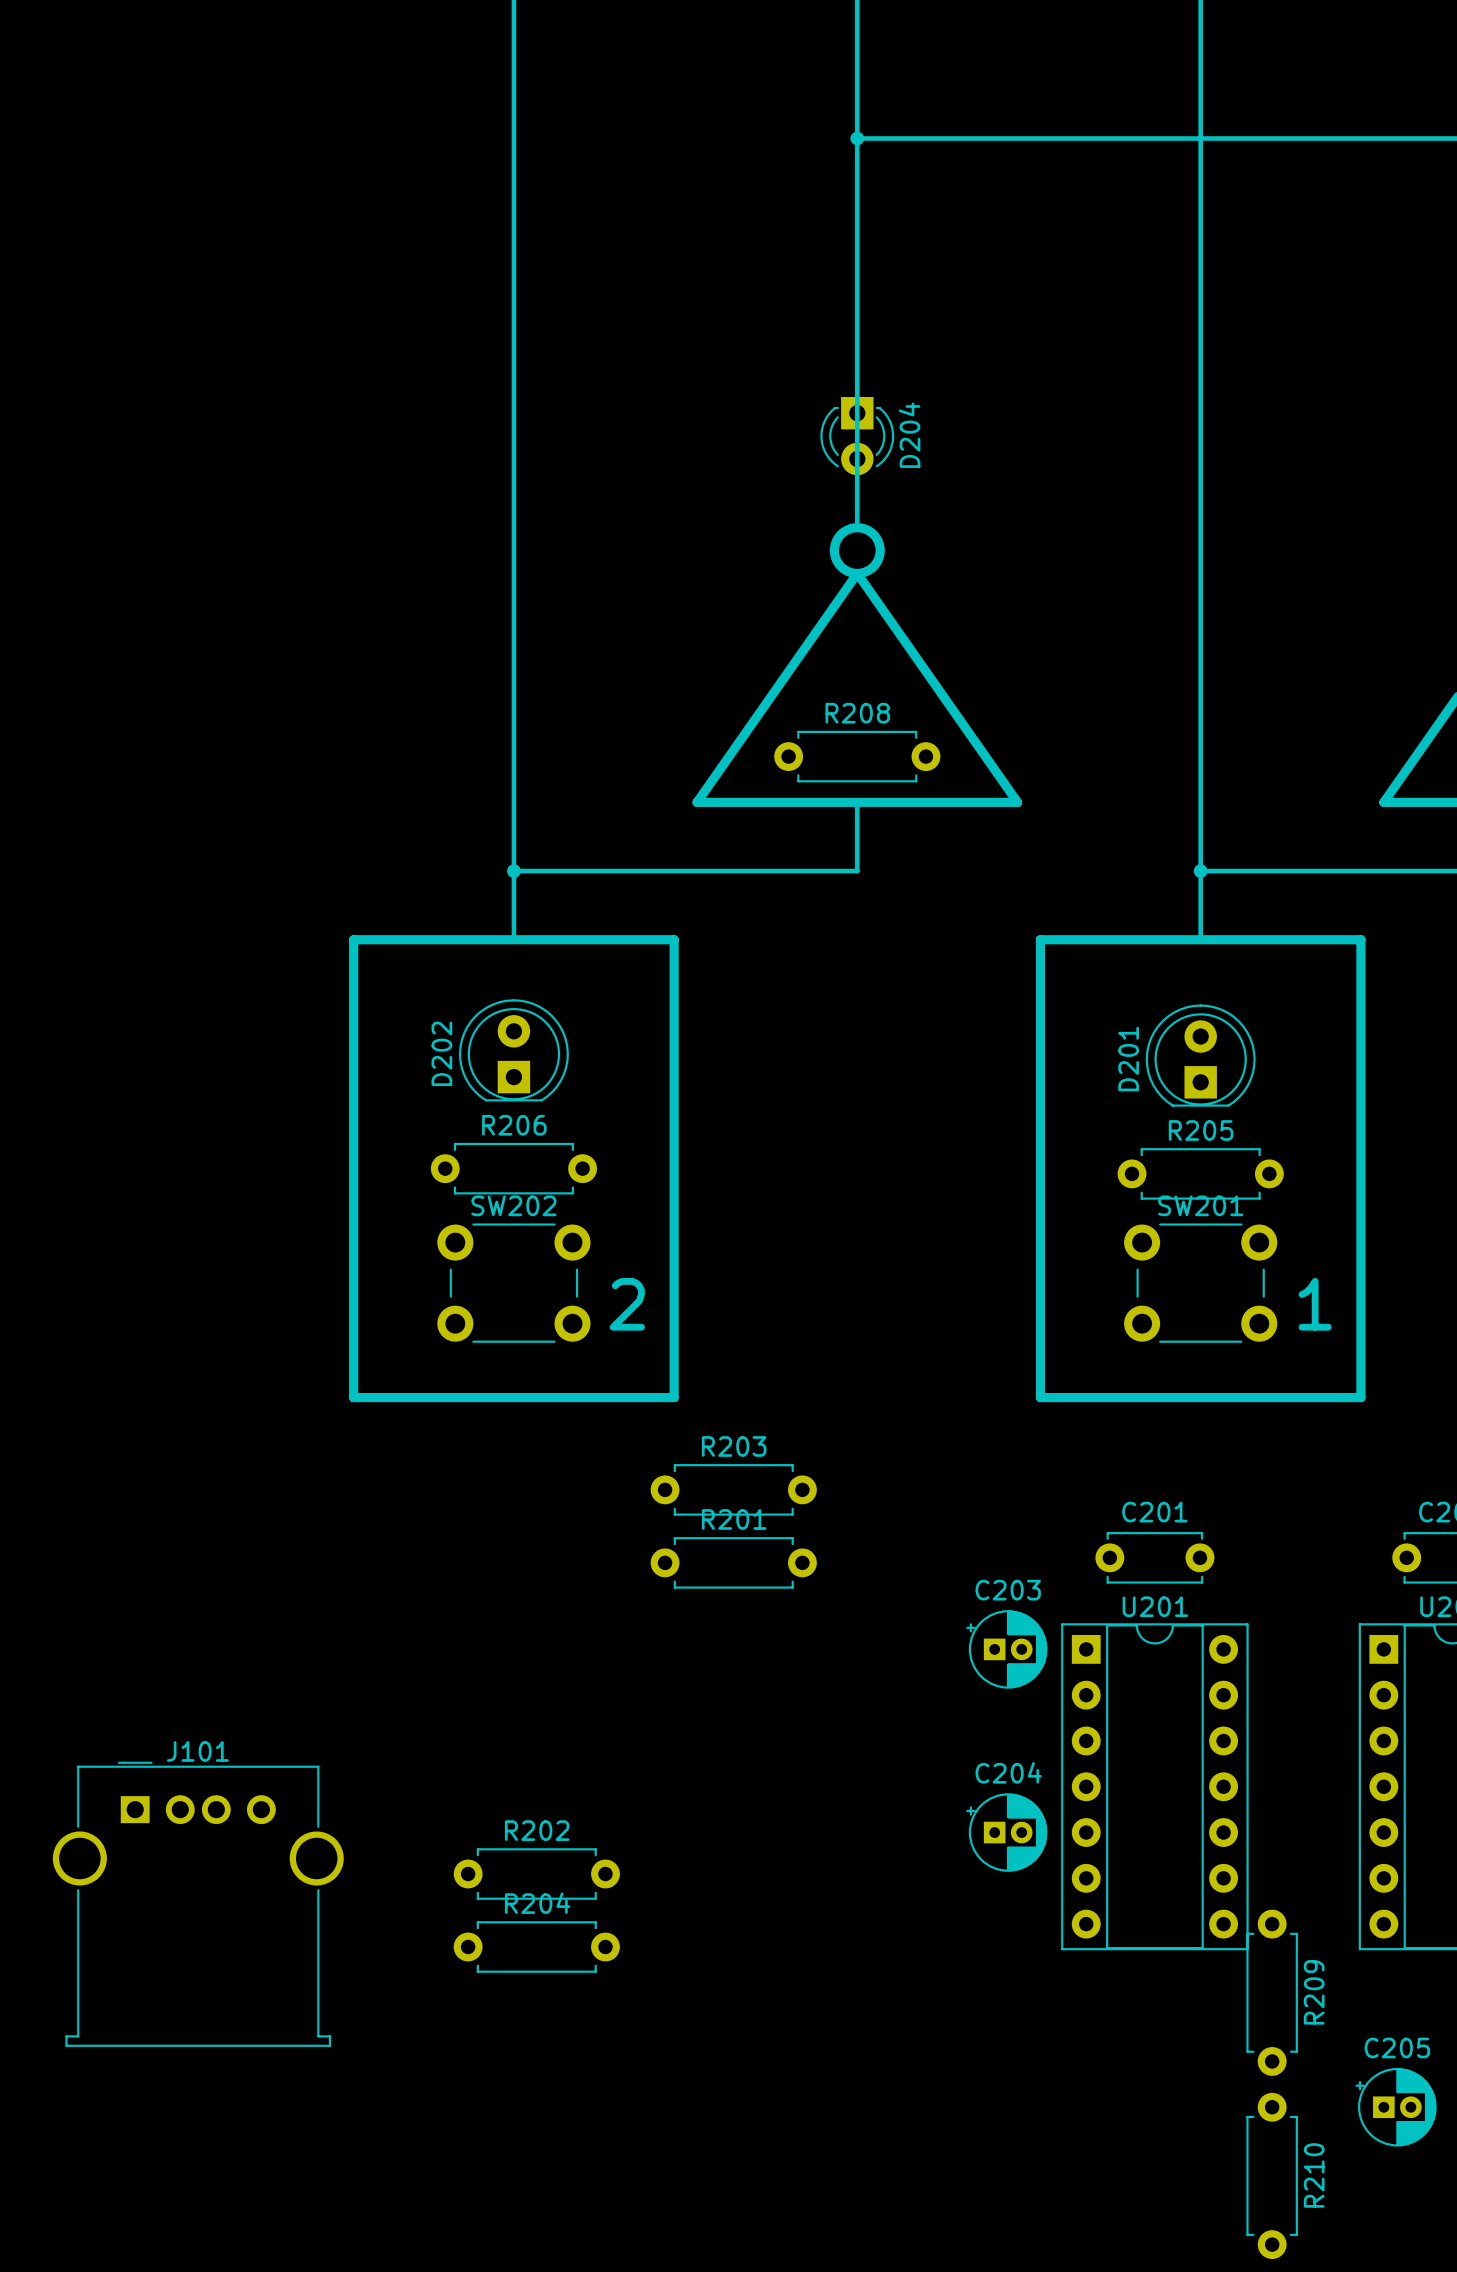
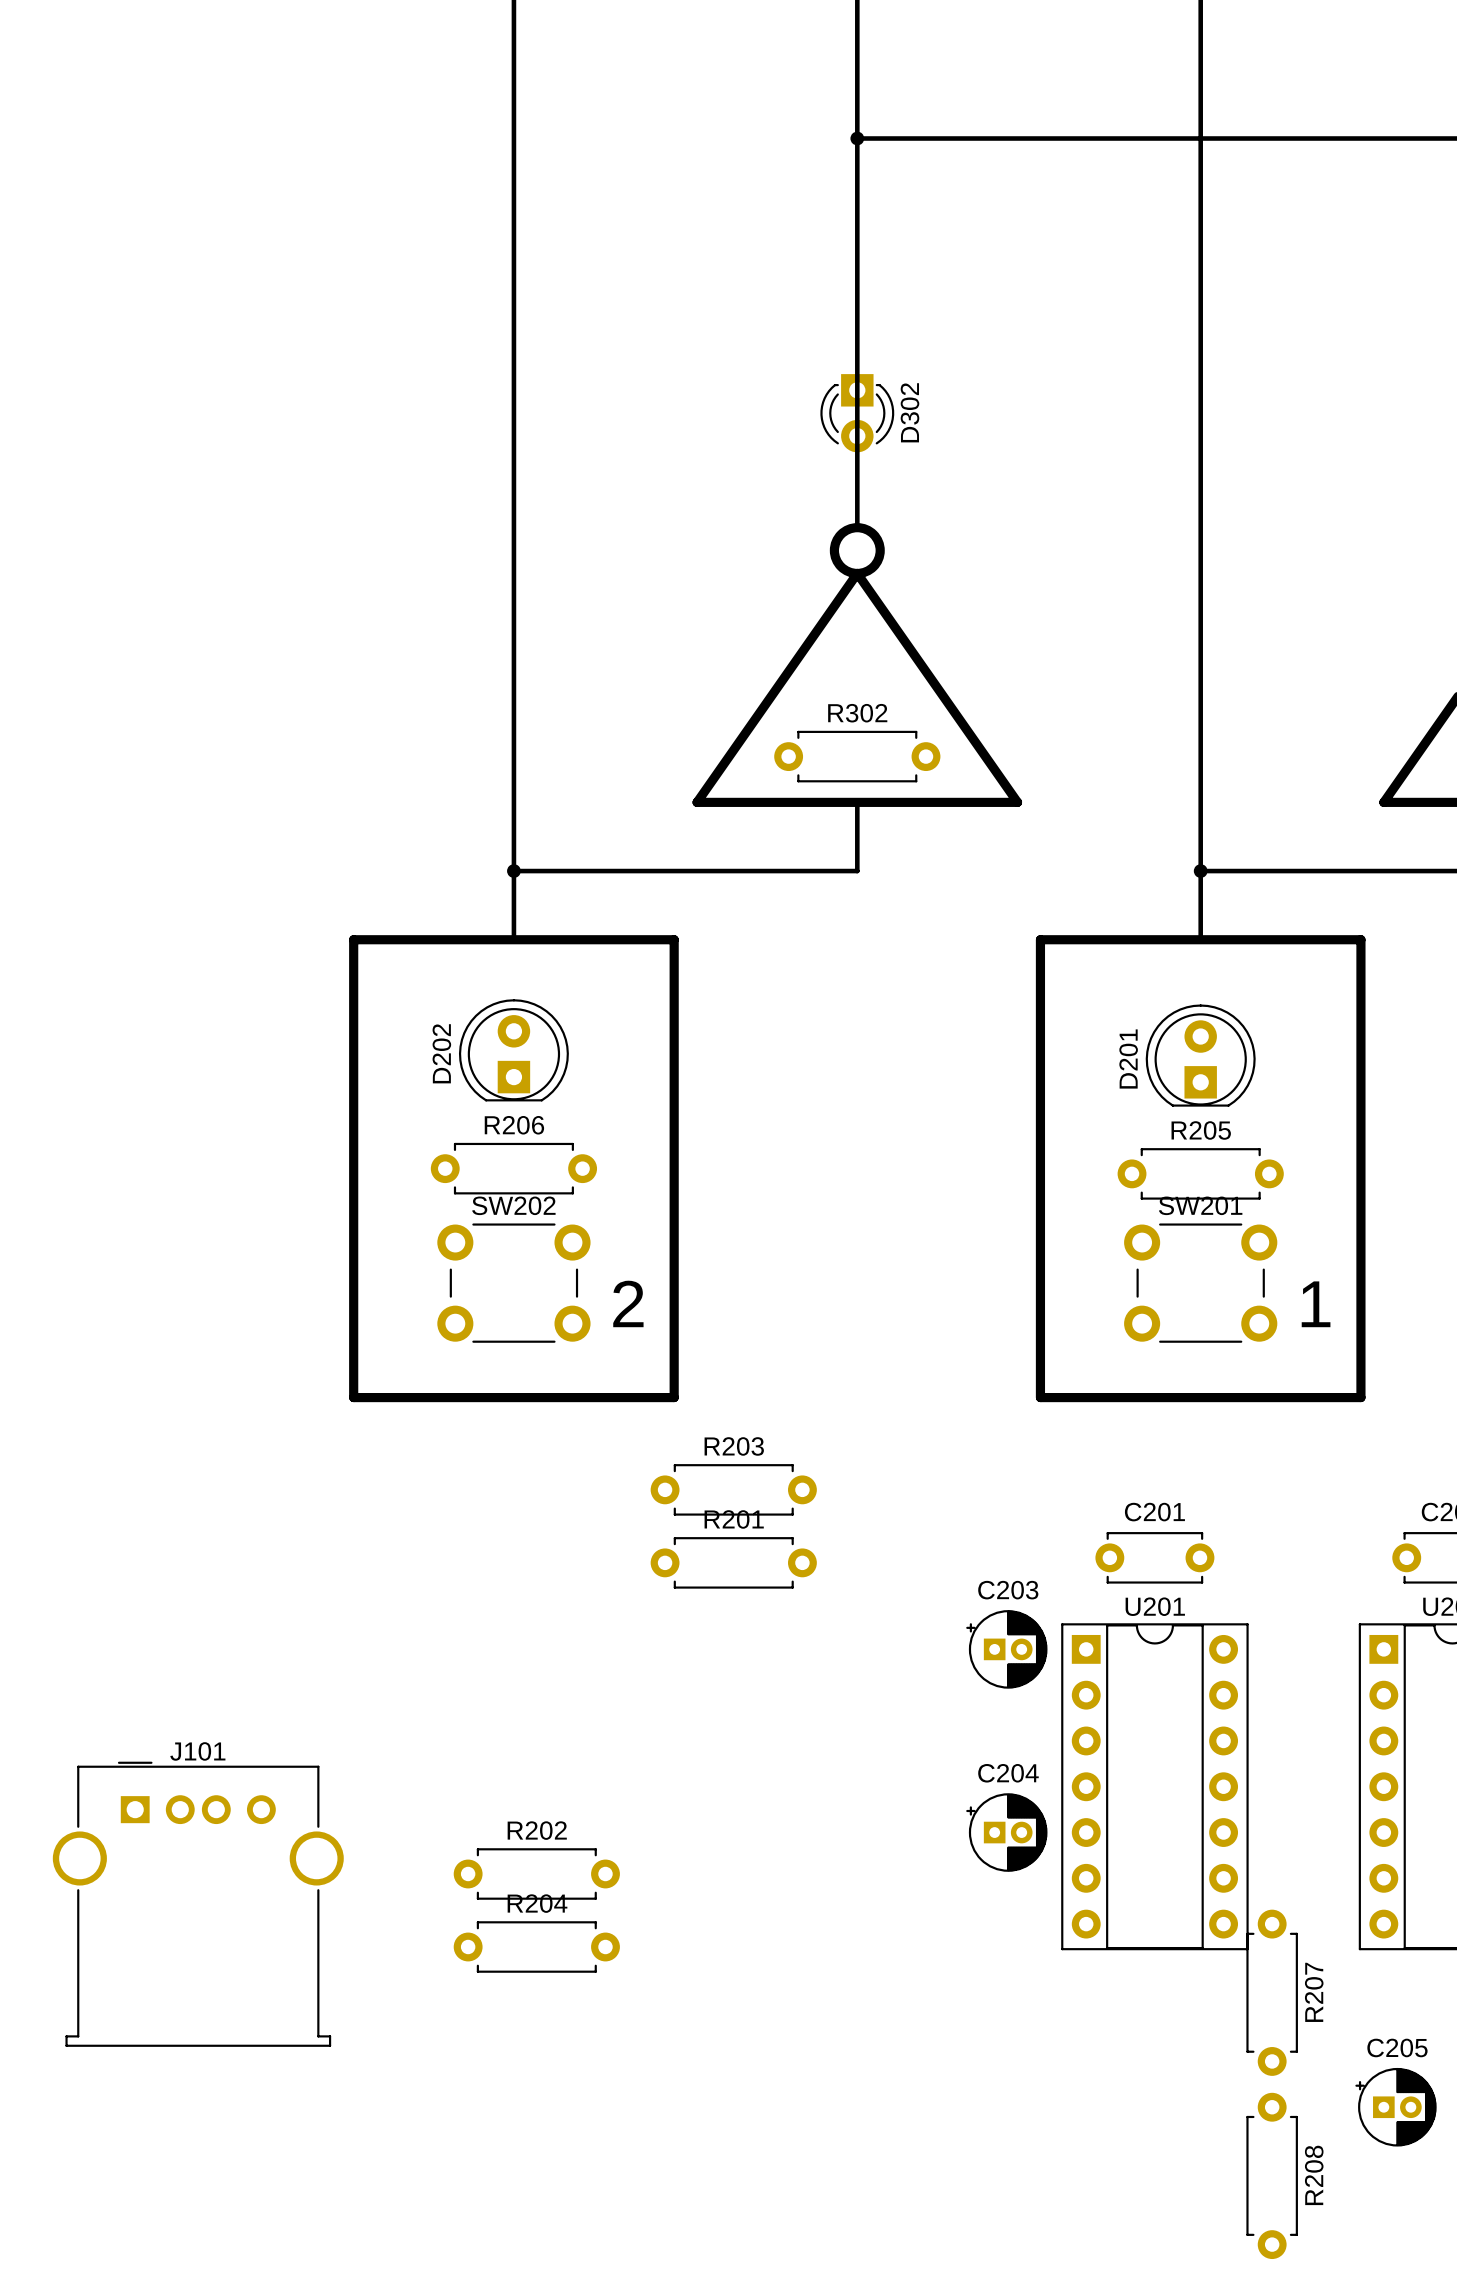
D302: none -> (857, 413)
D204: (857, 436) -> none
R208 name: R208 (857, 713) -> R302 (857, 713)
R209 name: R209 (1314, 1992) -> R207 (1314, 1992)
R210 name: R210 (1314, 2175) -> R208 (1314, 2175)

